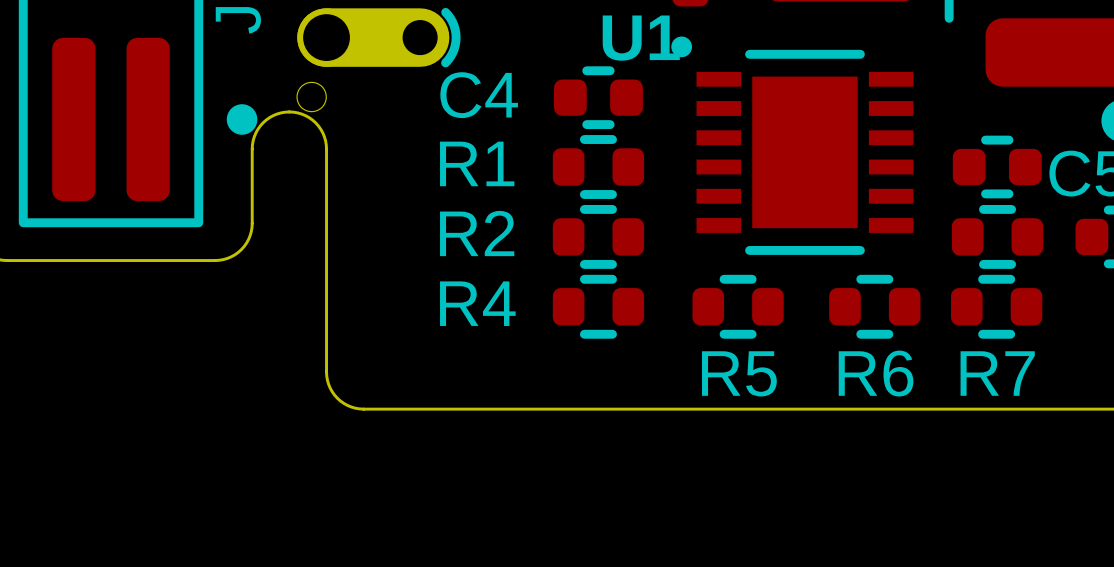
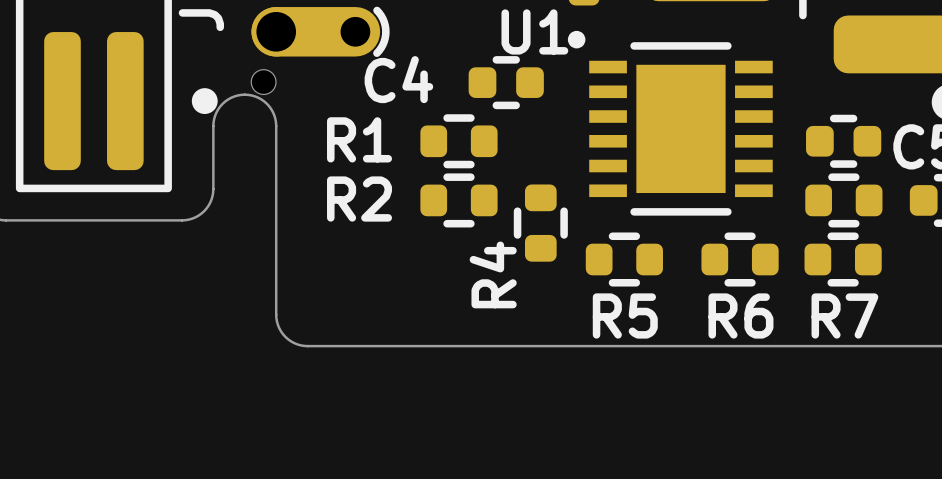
R1 name position: R1 (477, 163) -> R1 (359, 139)
R1 position: (598, 167) -> (458, 141)
R2 name position: R2 (477, 233) -> R2 (359, 199)
R2 position: (598, 236) -> (458, 200)
R4 rotation: 0° (598, 306) -> 90° clockwise (540, 223)
R4 position: (598, 306) -> (540, 223)

